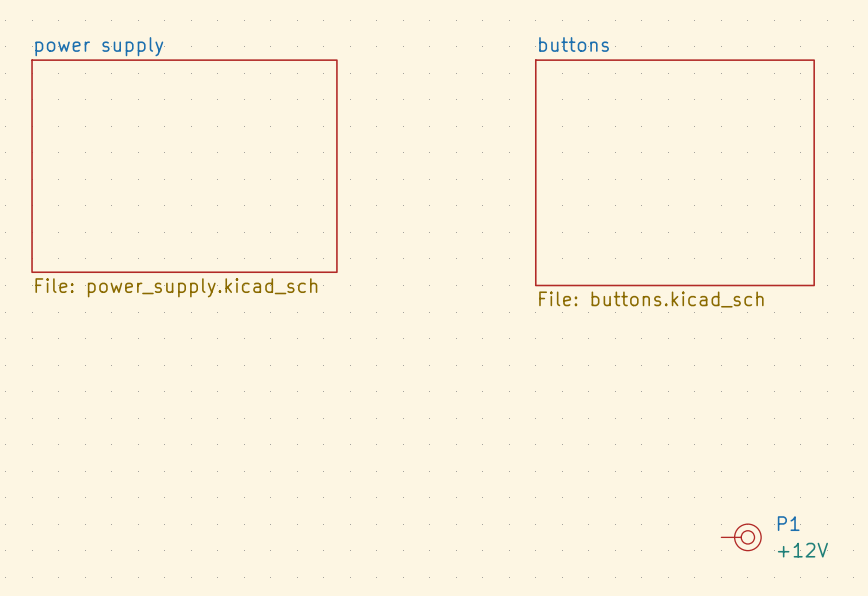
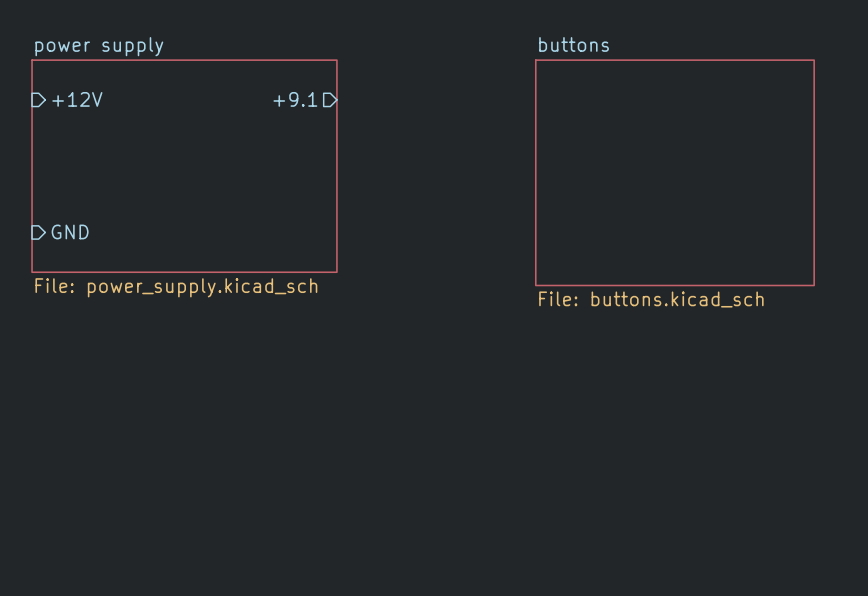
sheet pin: none -> +12V (77, 99)
sheet pin: none -> +9.1 (295, 99)
sheet pin: none -> GND (70, 231)
P1: +12V (741, 537) -> none

